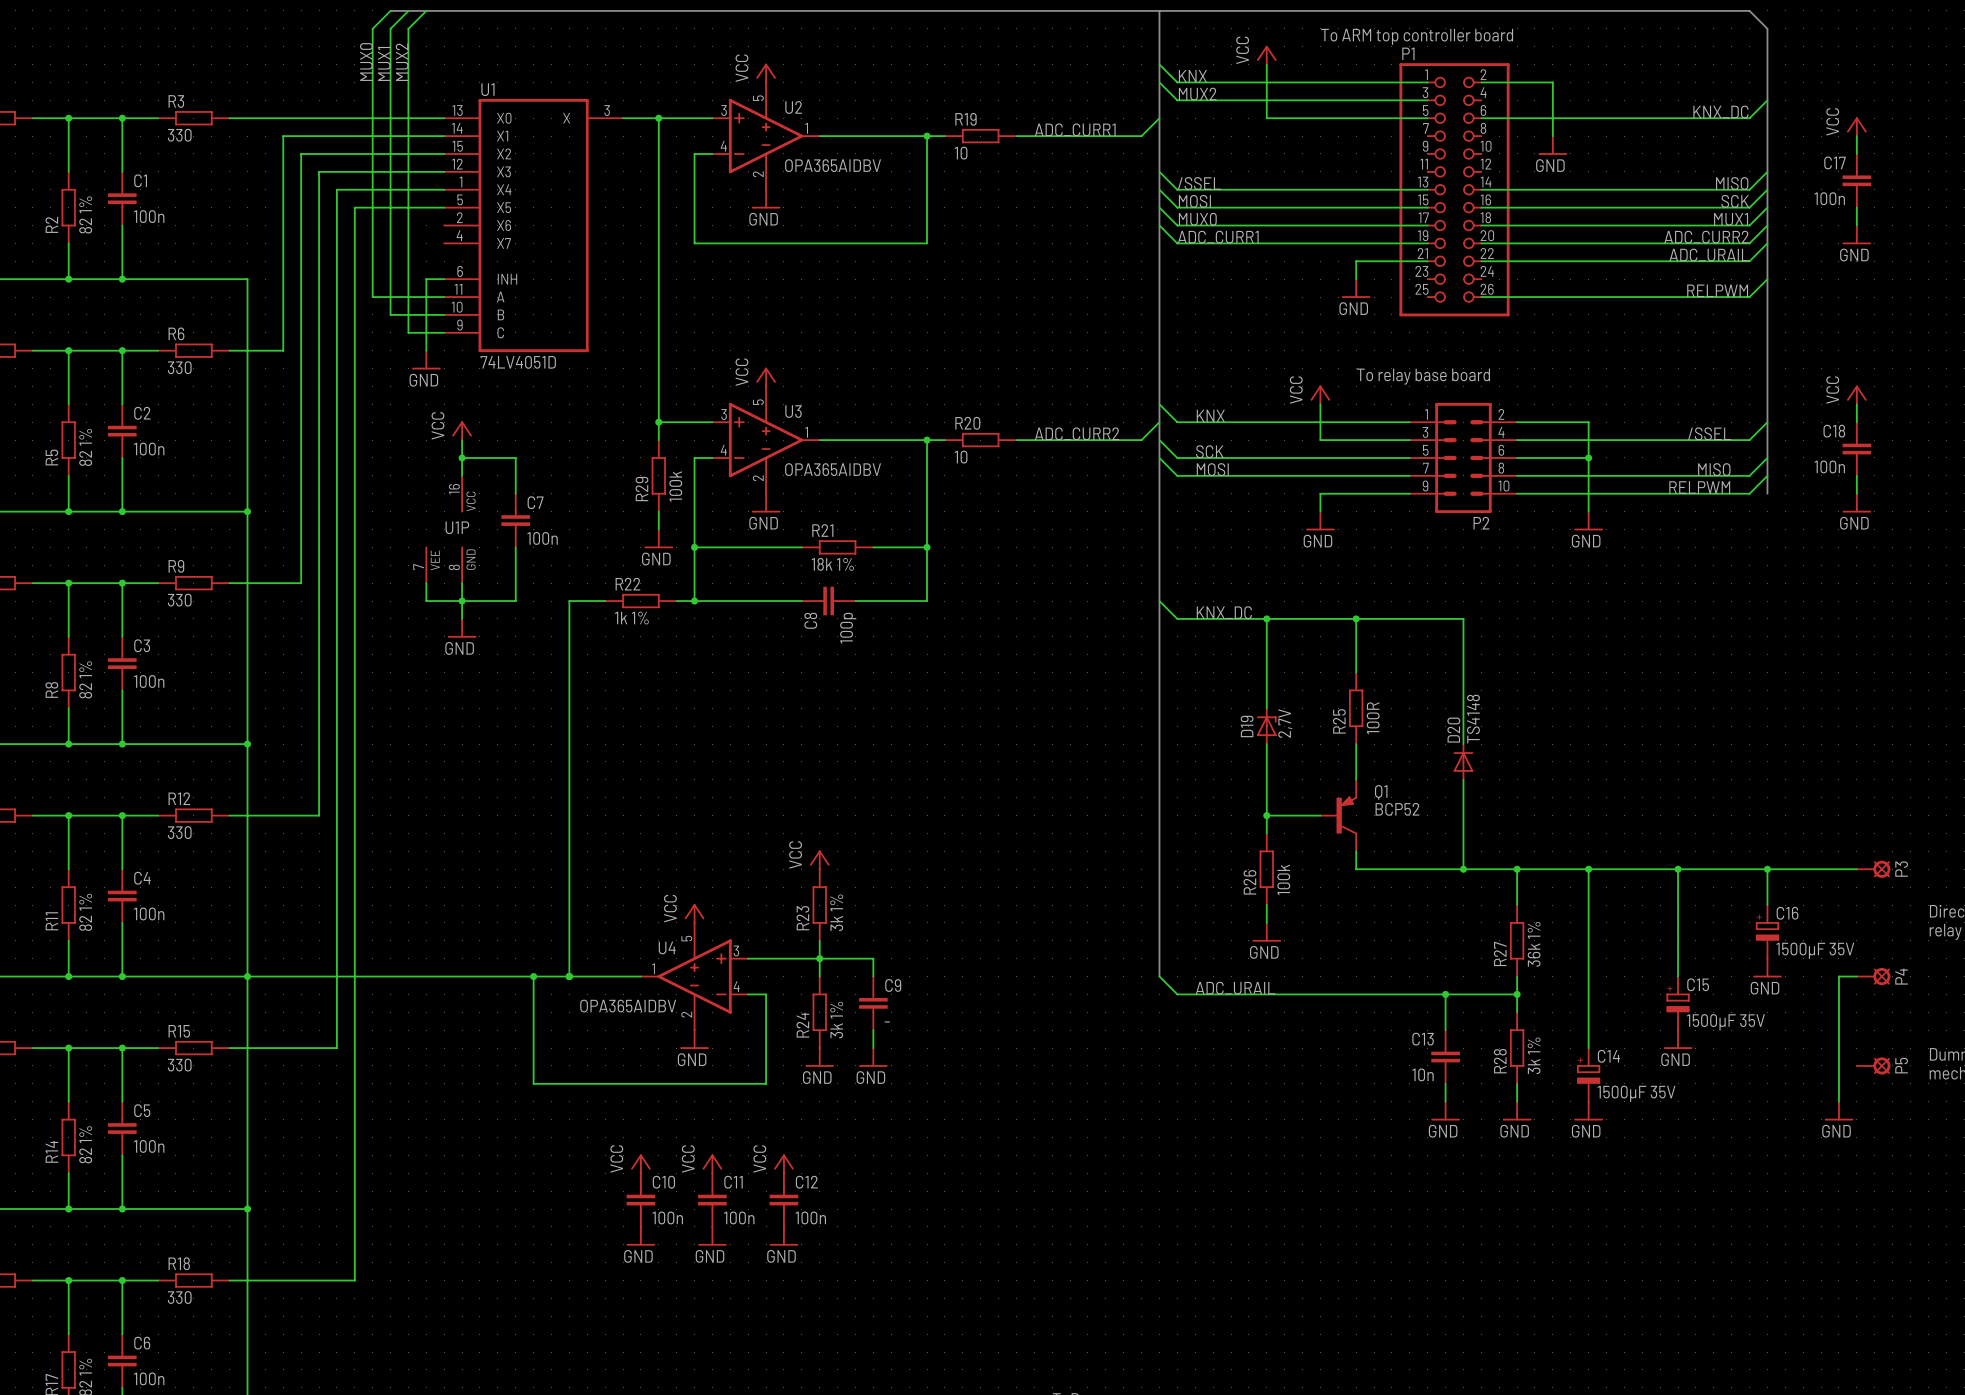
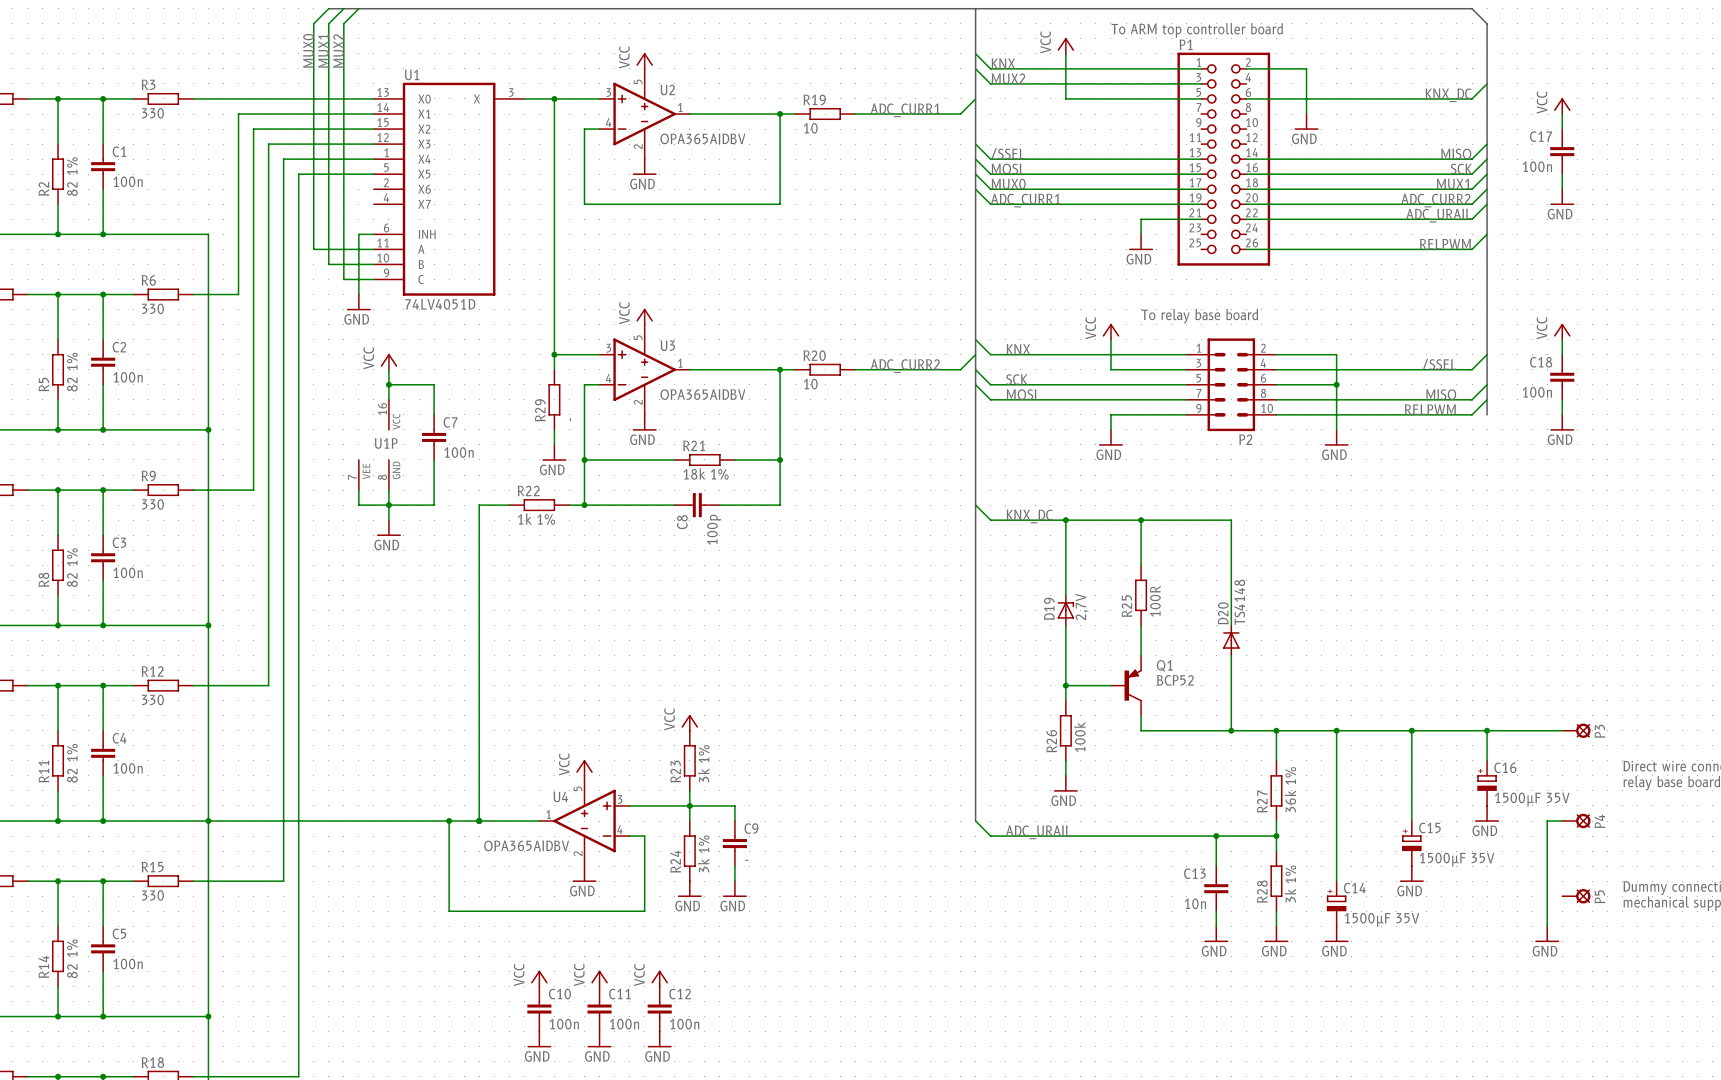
R29 value: 100k (675, 486) -> - (570, 419)

